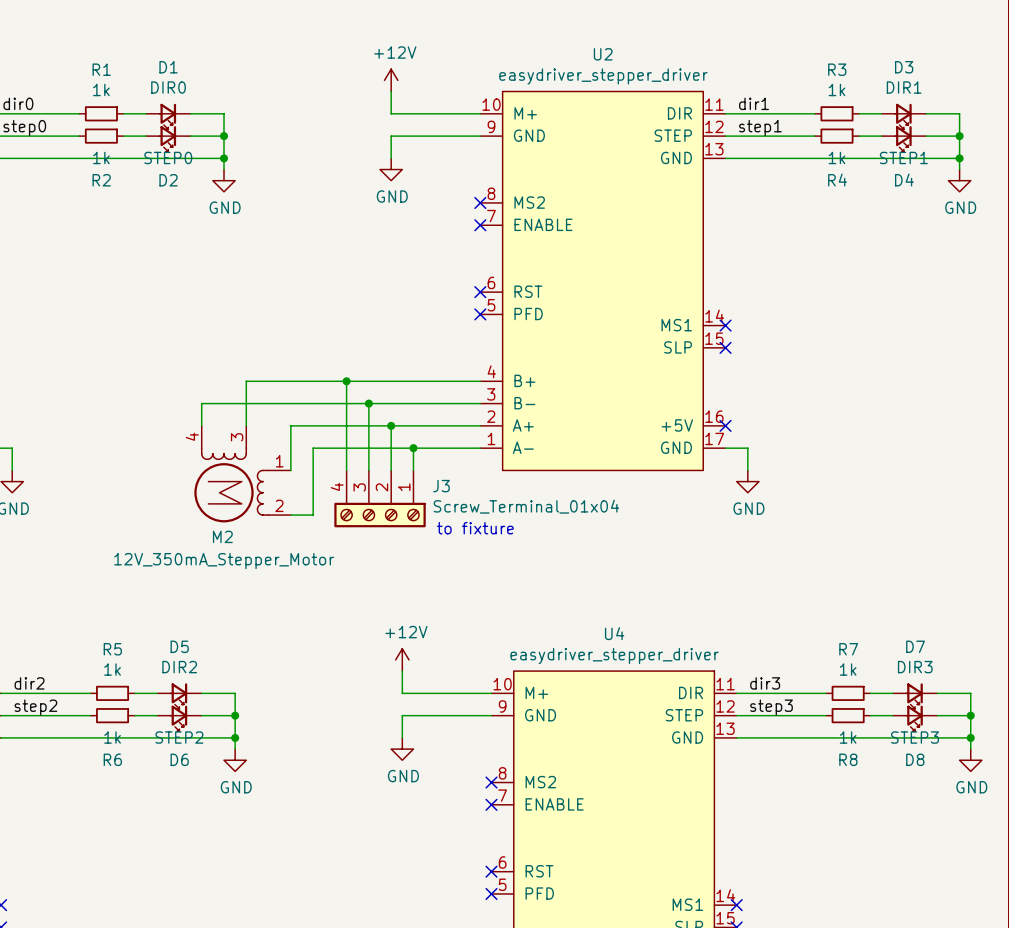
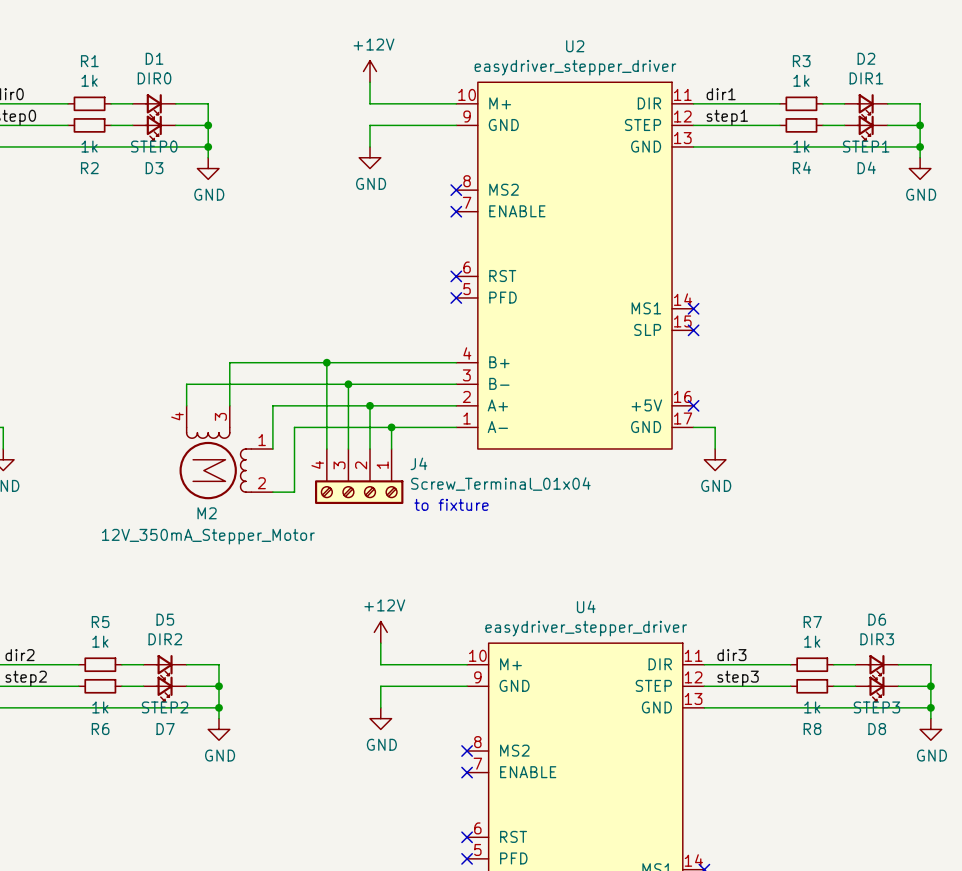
D3 name: D3 (904, 67) -> D2 (866, 58)
D2 name: D2 (168, 180) -> D3 (154, 168)
J3 name: J3 (441, 486) -> J4 (418, 463)
D7 name: D7 (915, 646) -> D6 (877, 619)
D6 name: D6 (179, 759) -> D7 (165, 729)

